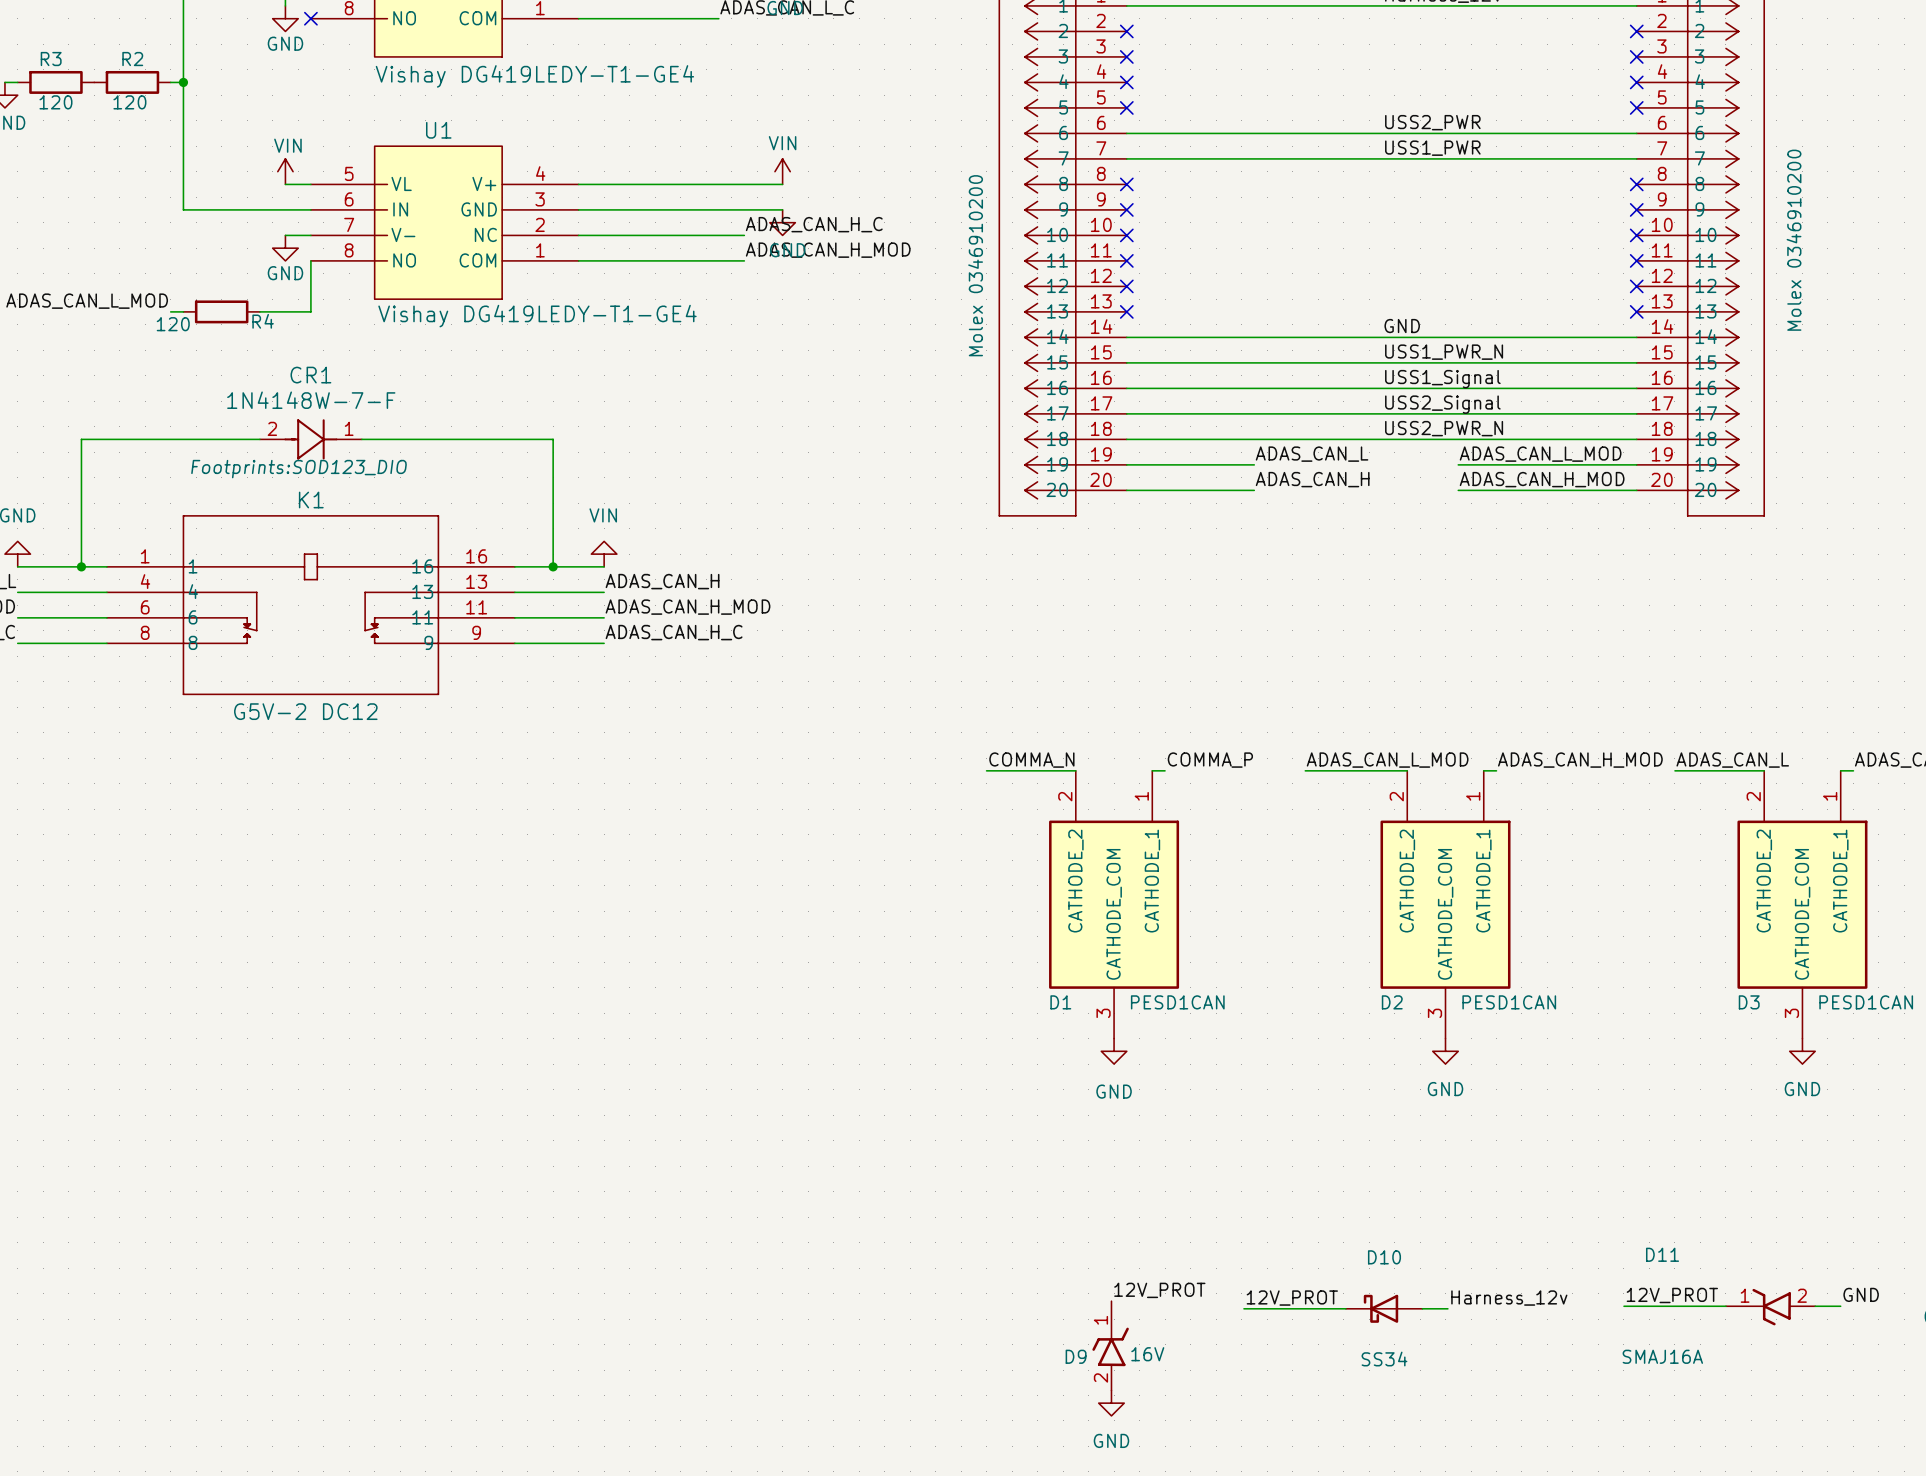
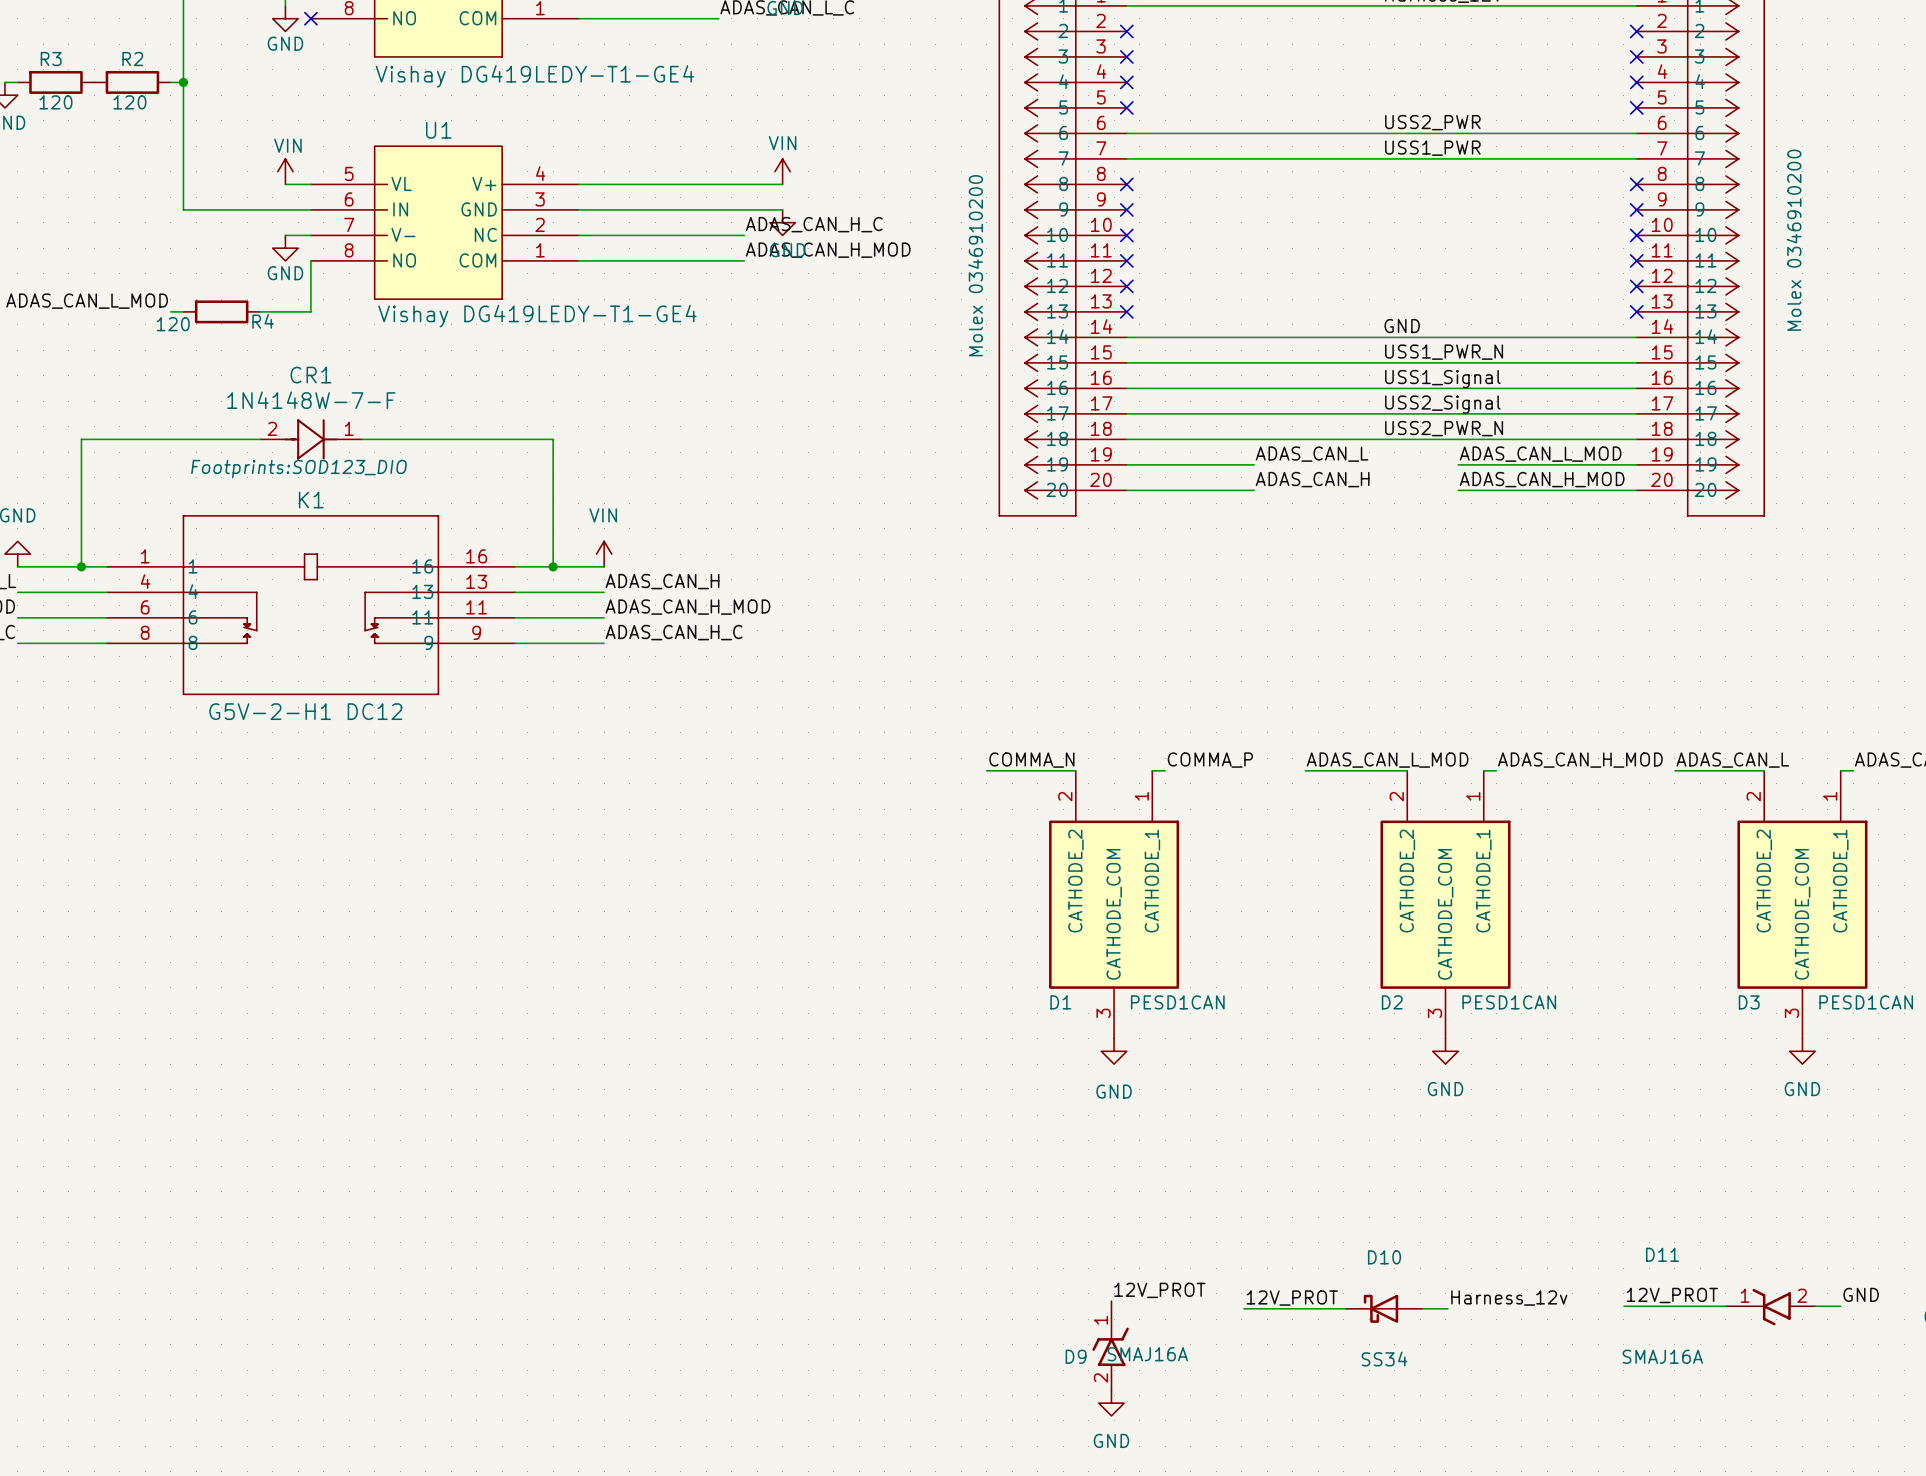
power symbol shape: [591, 541, 617, 567] -> [596, 541, 612, 567]
K1 value: G5V-2 DC12 (305, 711) -> G5V-2-H1 DC12 (305, 711)
D9 value: 16V (1147, 1354) -> SMAJ16A (1147, 1354)

